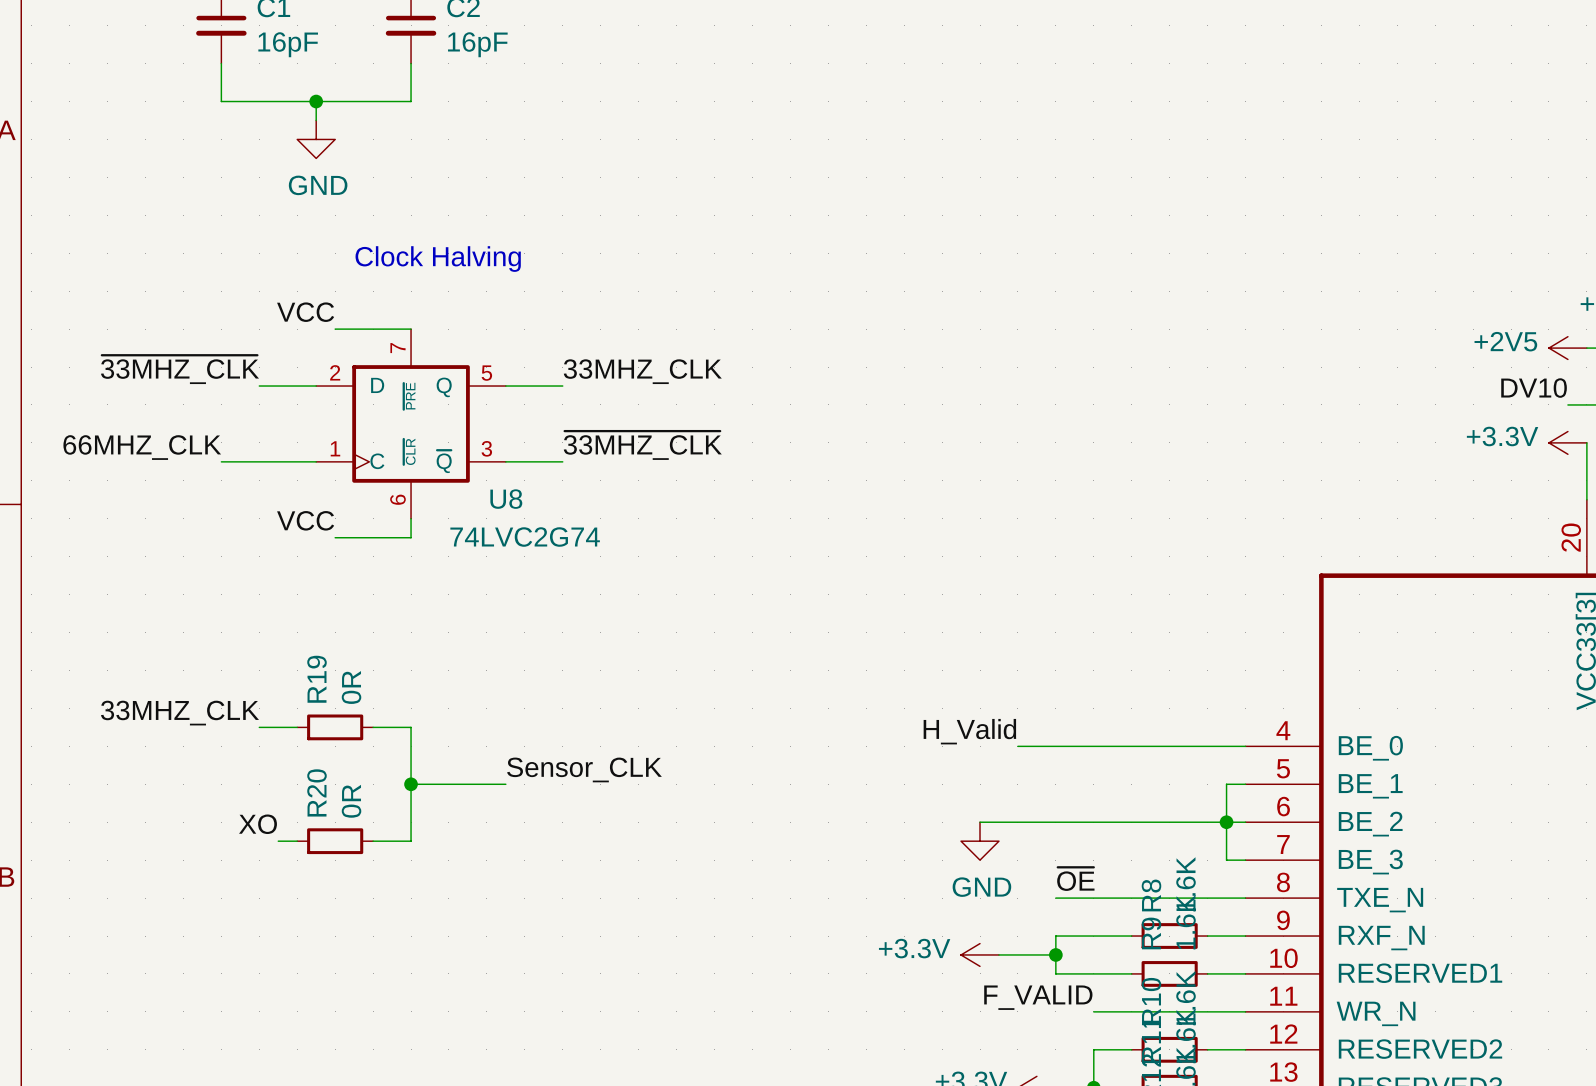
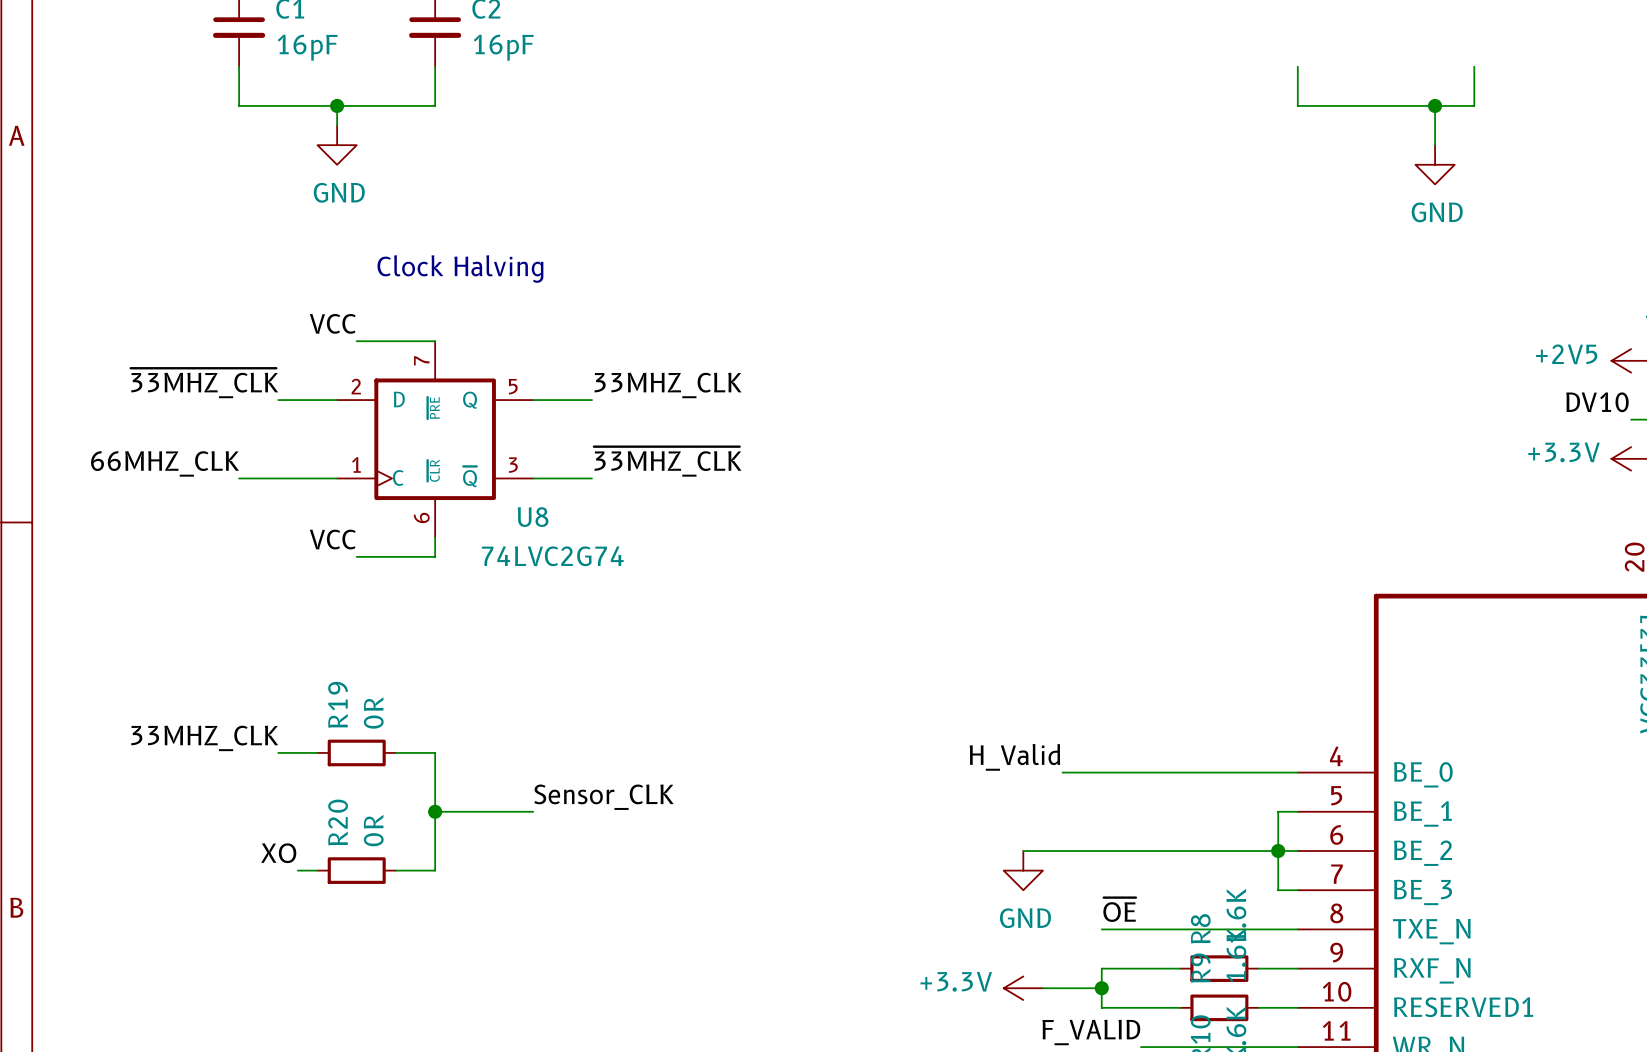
wire: none -> (1297, 66) (1297, 105) (1474, 105) (1474, 66)
wire: none -> (1435, 105) (1435, 145)
junction: none -> (1435, 105)
power symbol: none -> GND (1435, 164)

